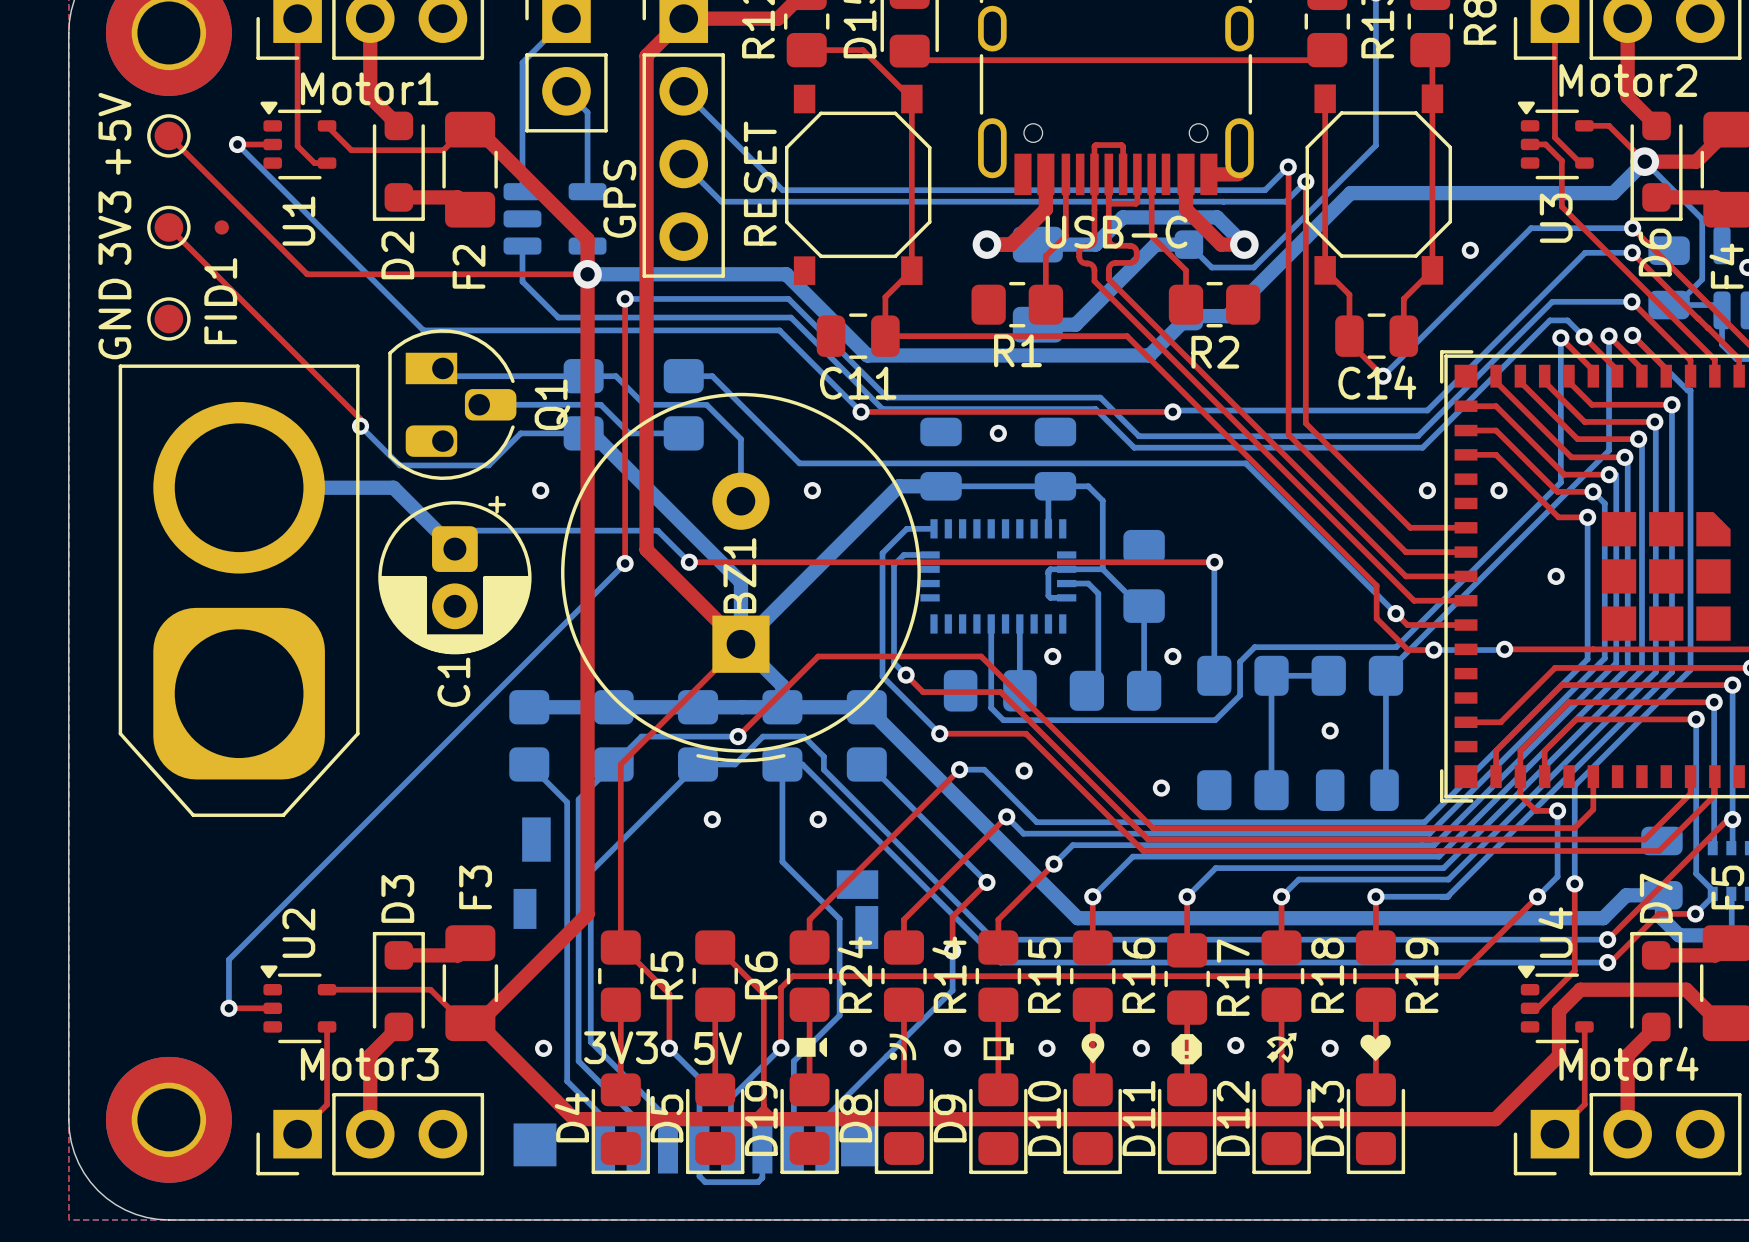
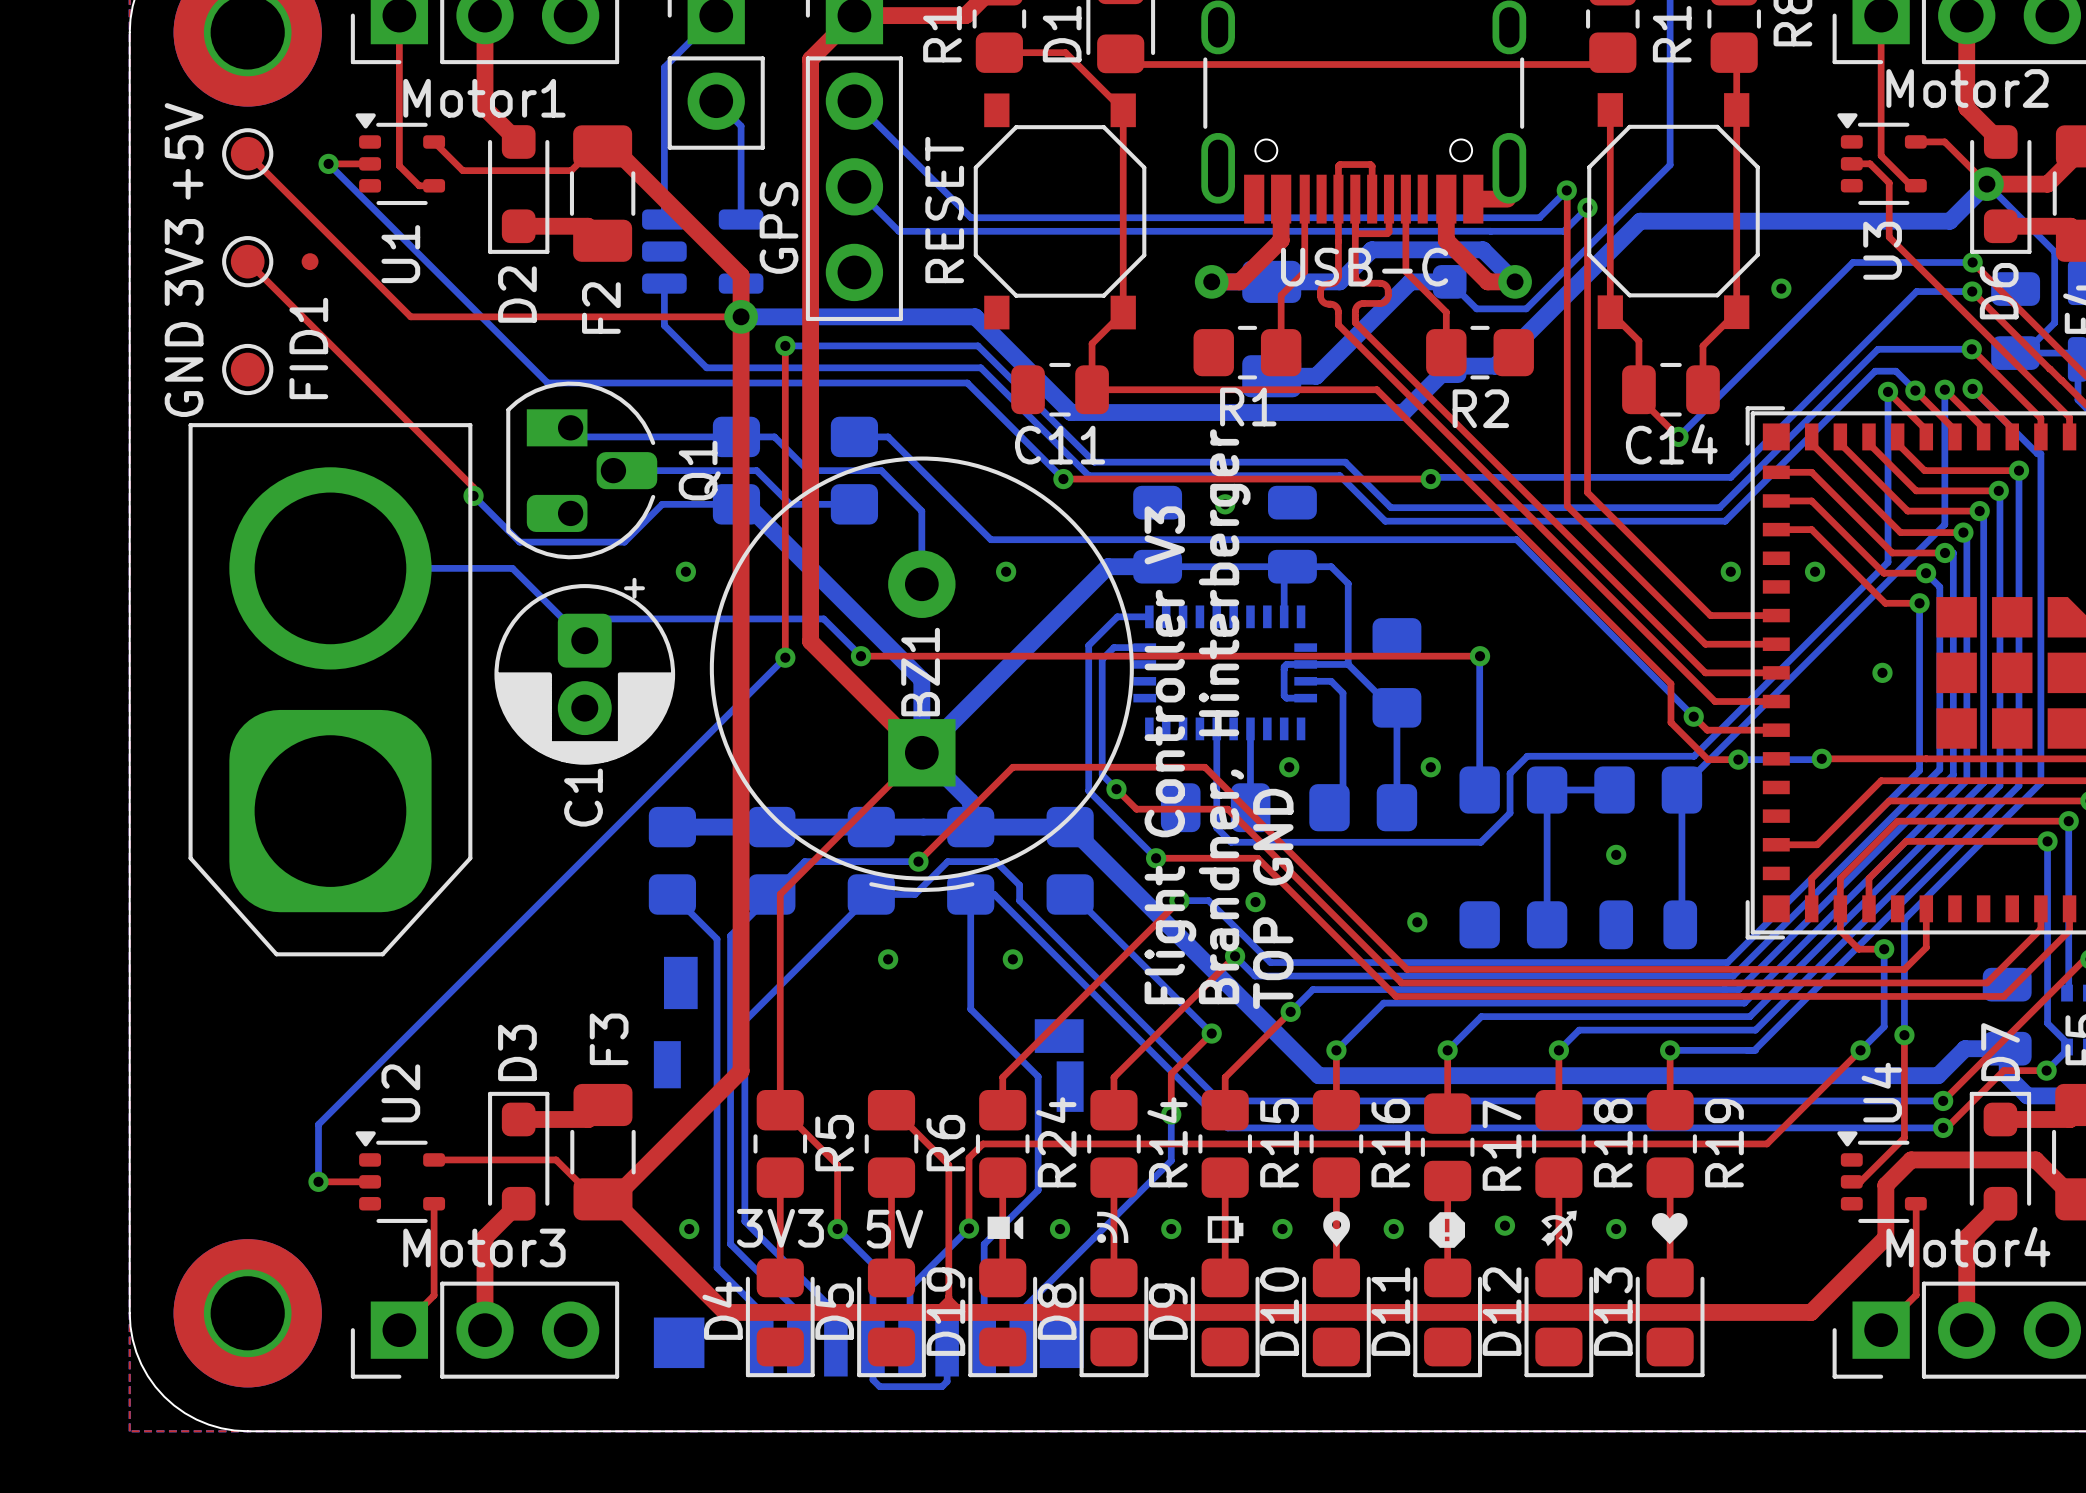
bottom track width: thick (239, 487) (393, 487) (454, 549) -> thin (330, 568) (512, 568) (584, 640)
text: none -> Brandner, Hinterberger (1224, 716)
text: none -> Flight Controller V3 (1170, 755)
text: none -> TOP GND (1273, 898)

